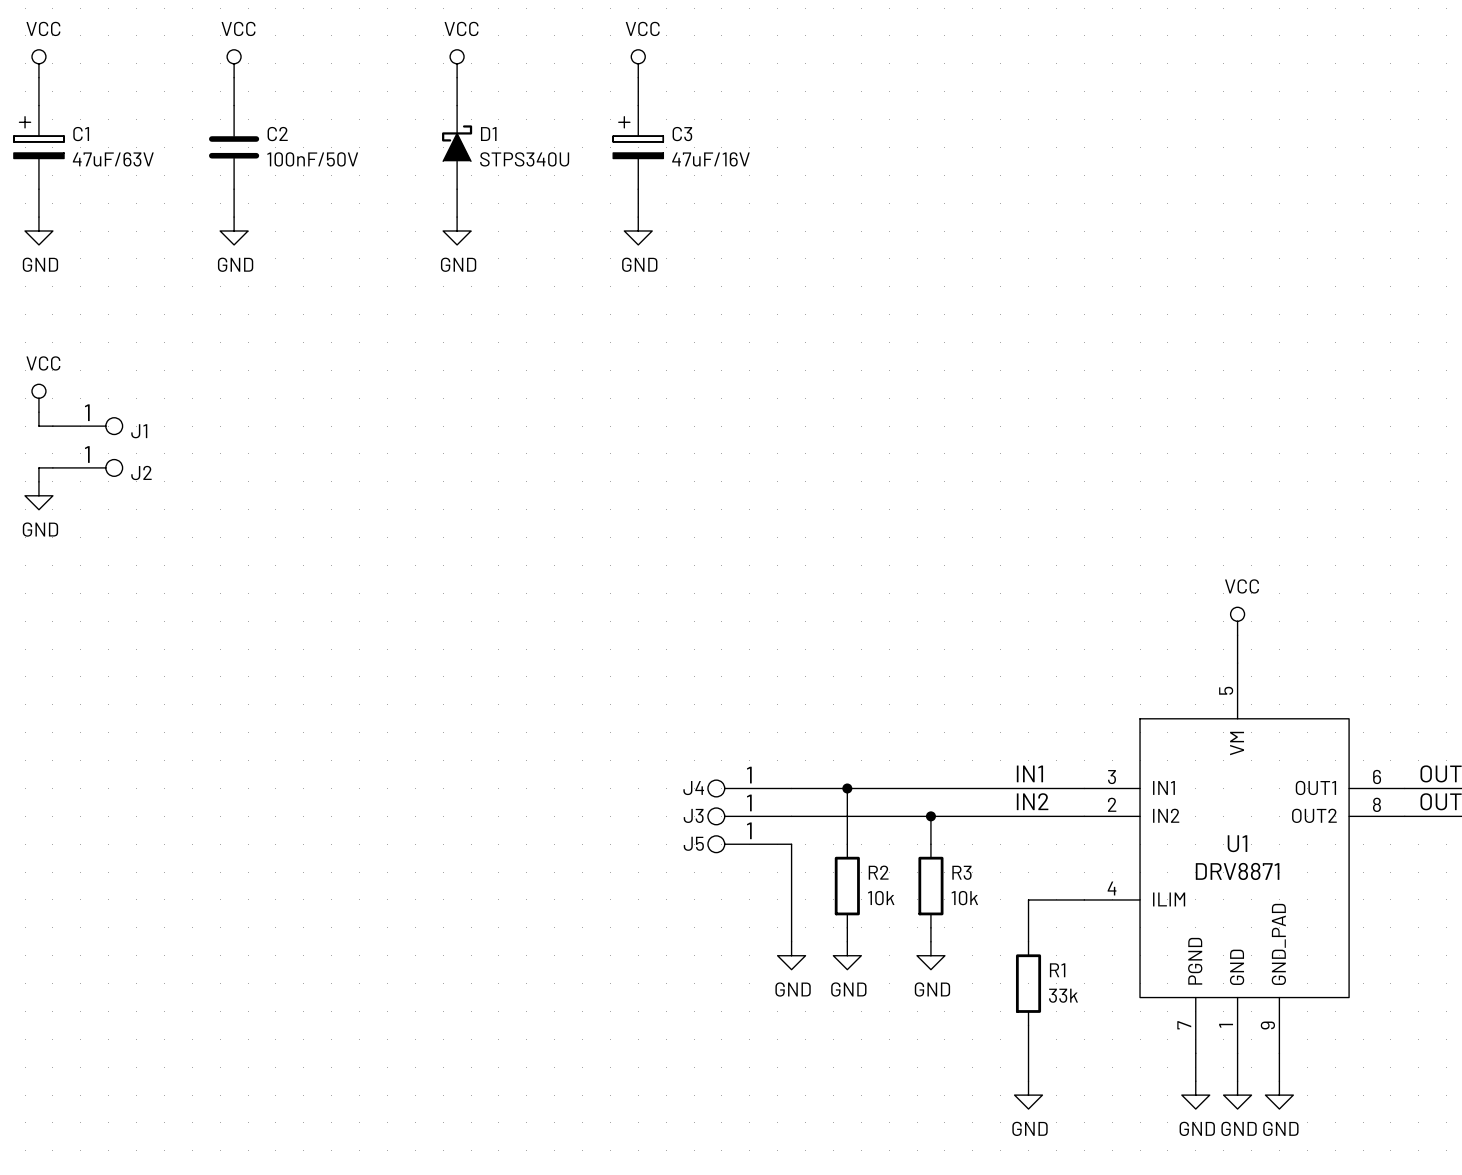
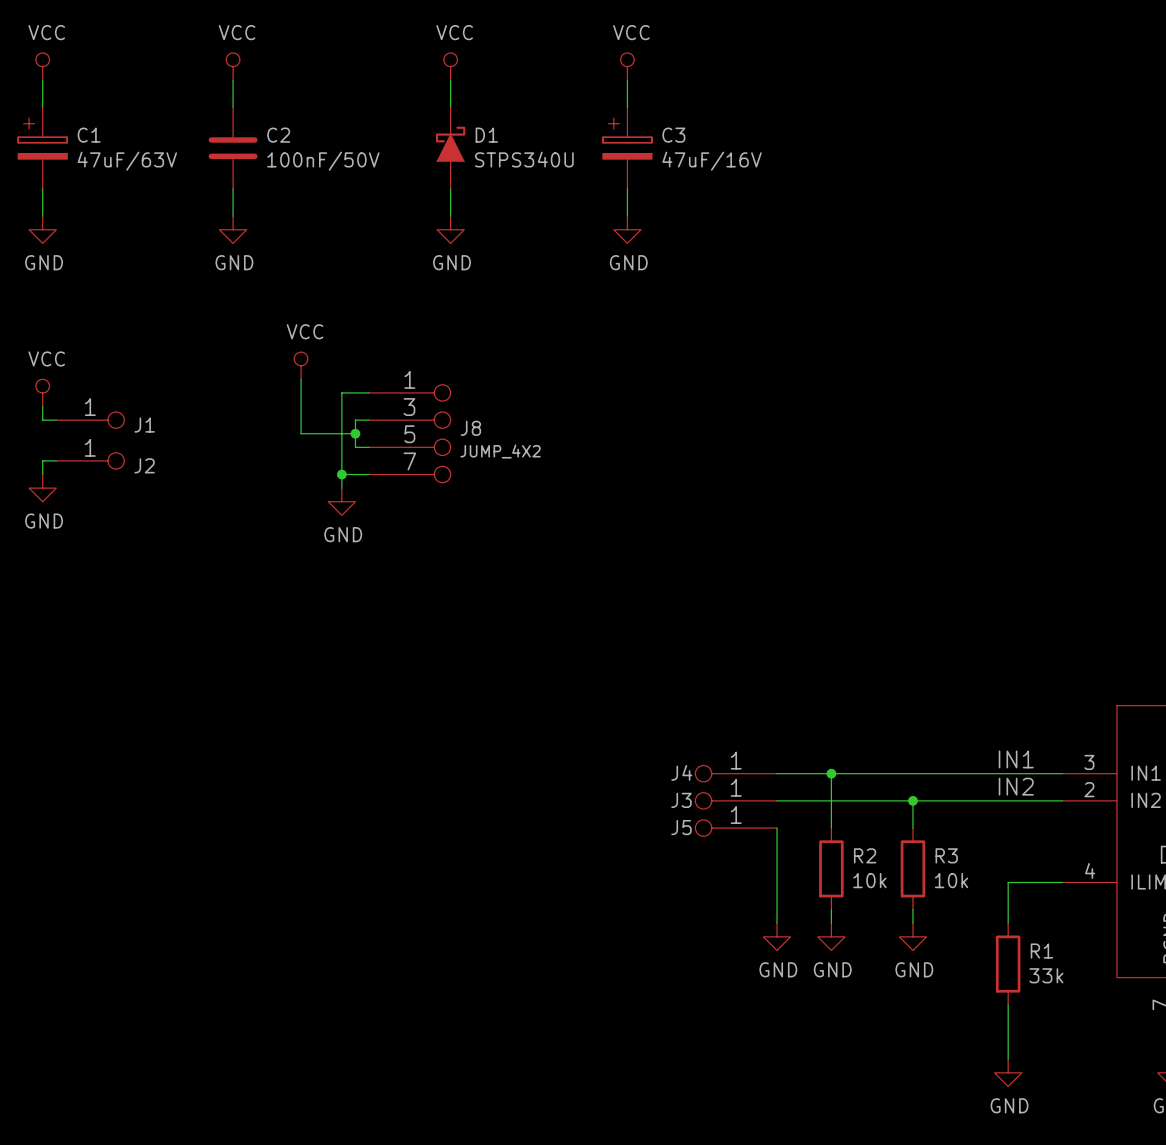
power symbol: none -> VCC (301, 365)
wire: none -> (301, 379) (301, 433) (355, 433)
wire: none -> (369, 392) (341, 392) (341, 488)
wire: none -> (369, 420) (355, 420) (355, 447) (369, 447)
junction: none -> (355, 433)
J8: none -> JUMP_4X2 (409, 433)
wire: none -> (341, 474) (369, 474)
junction: none -> (341, 474)
power symbol: none -> GND (341, 501)

